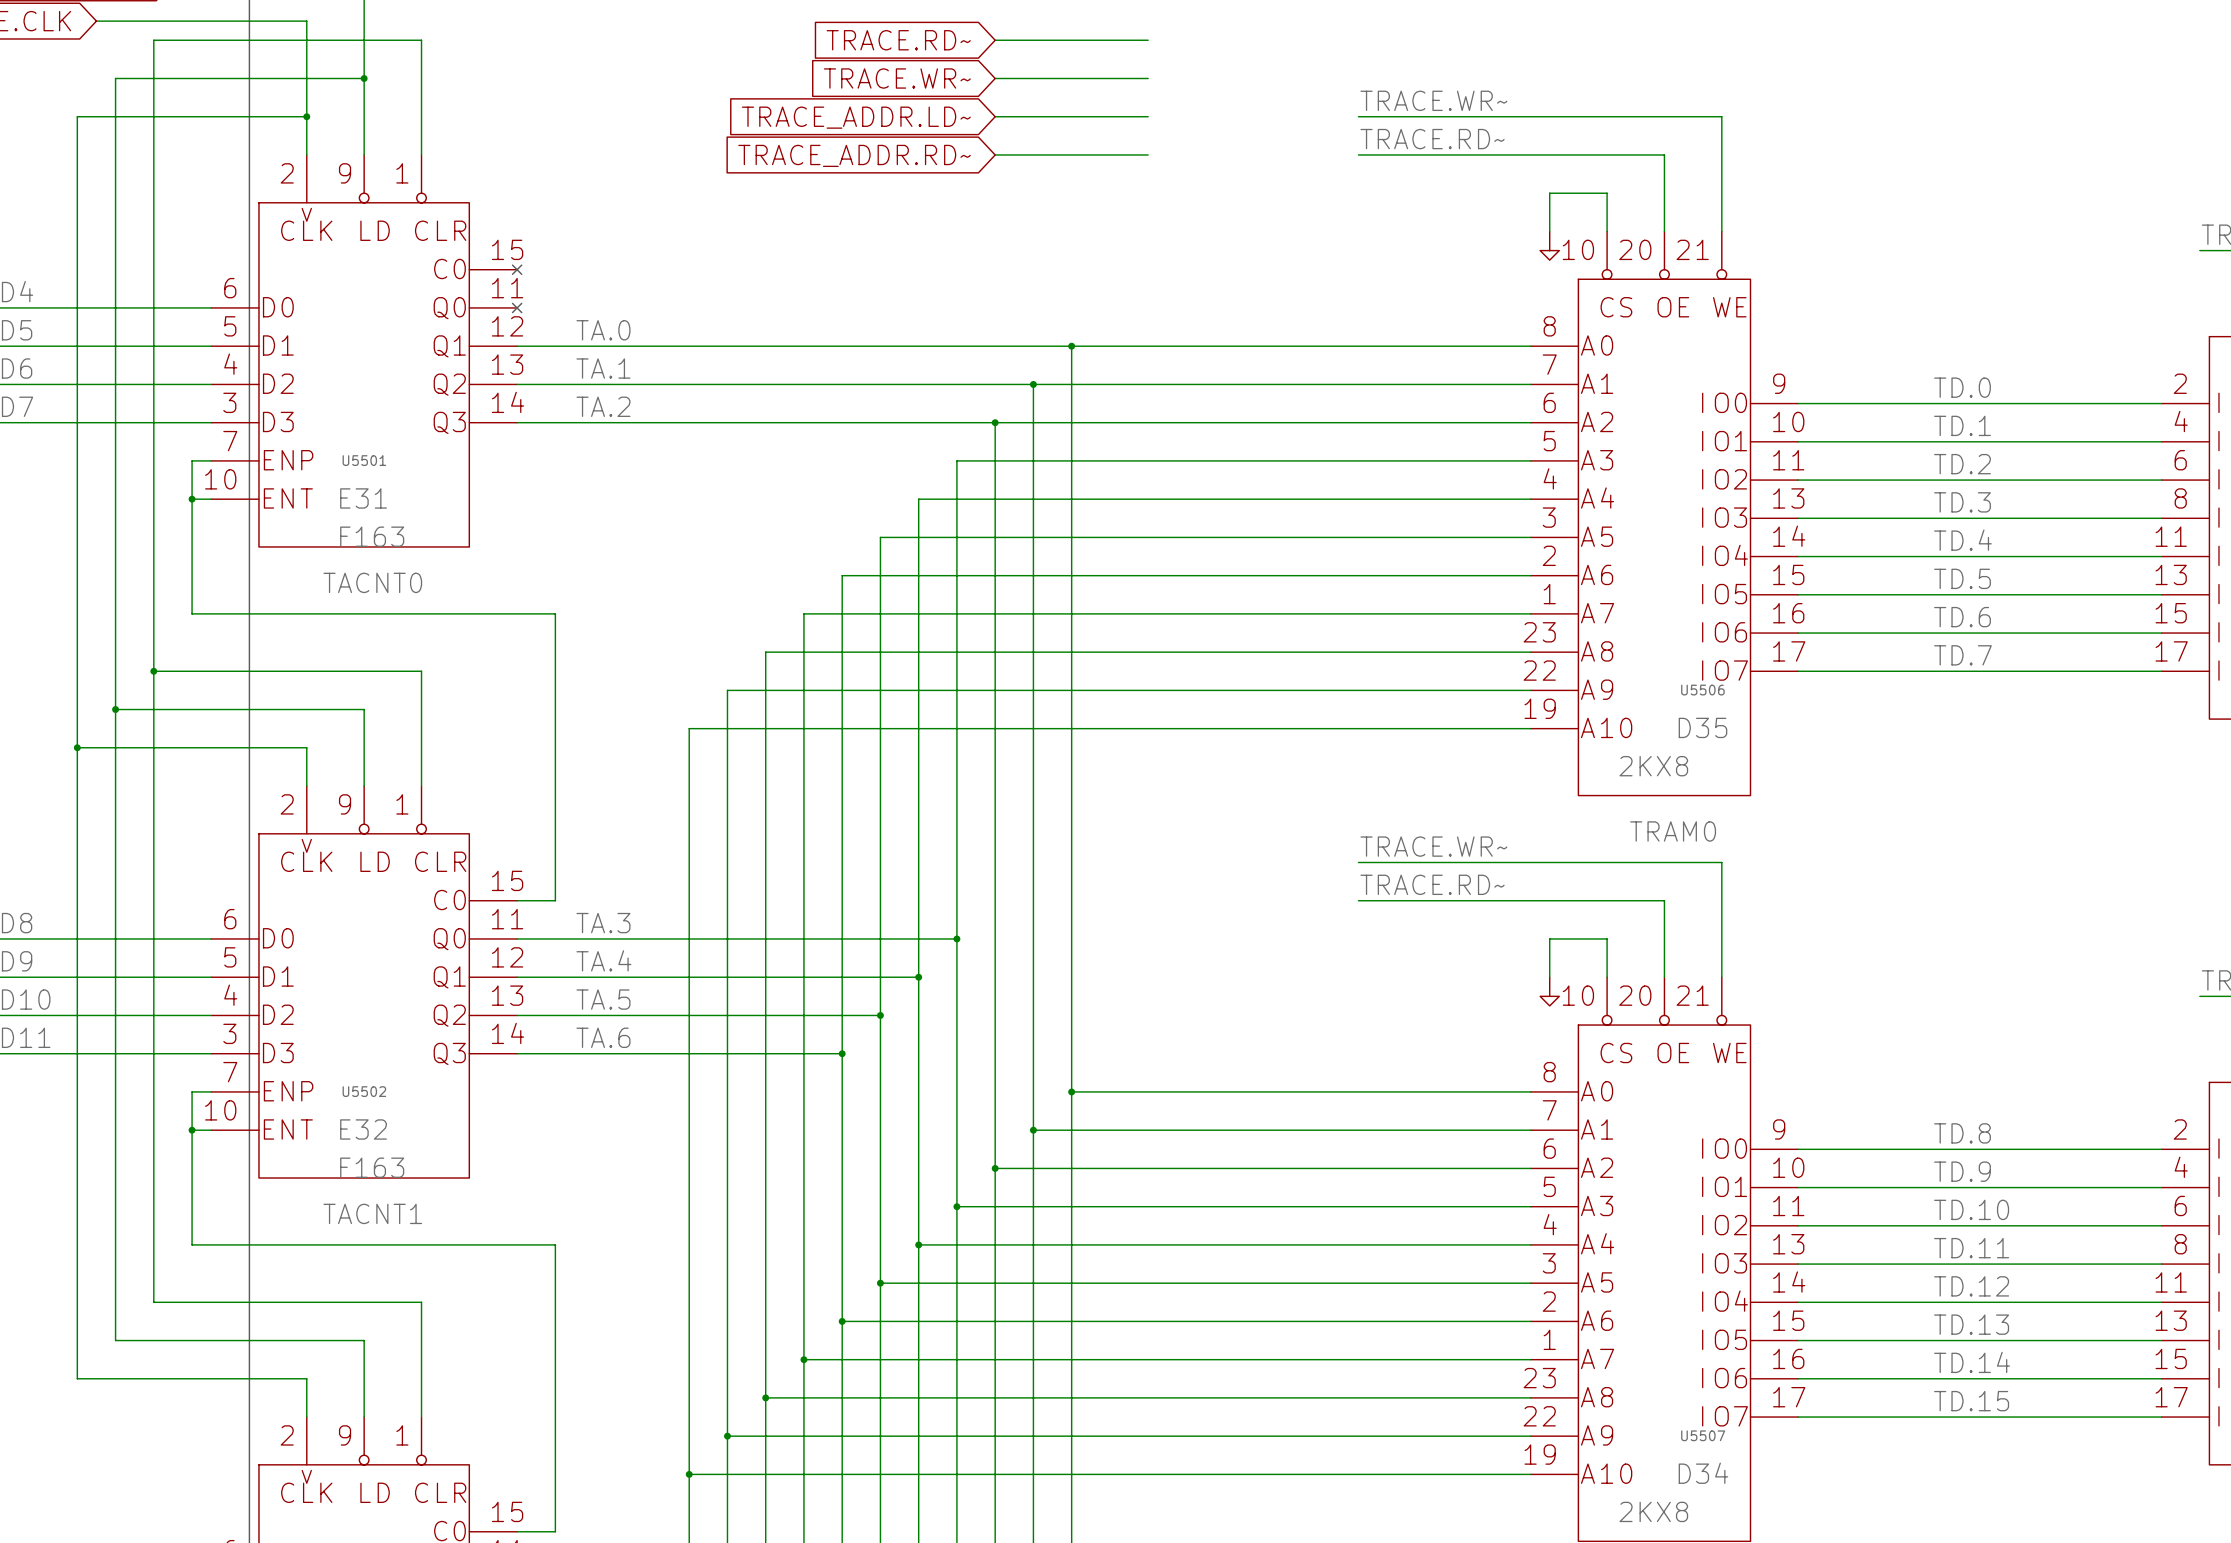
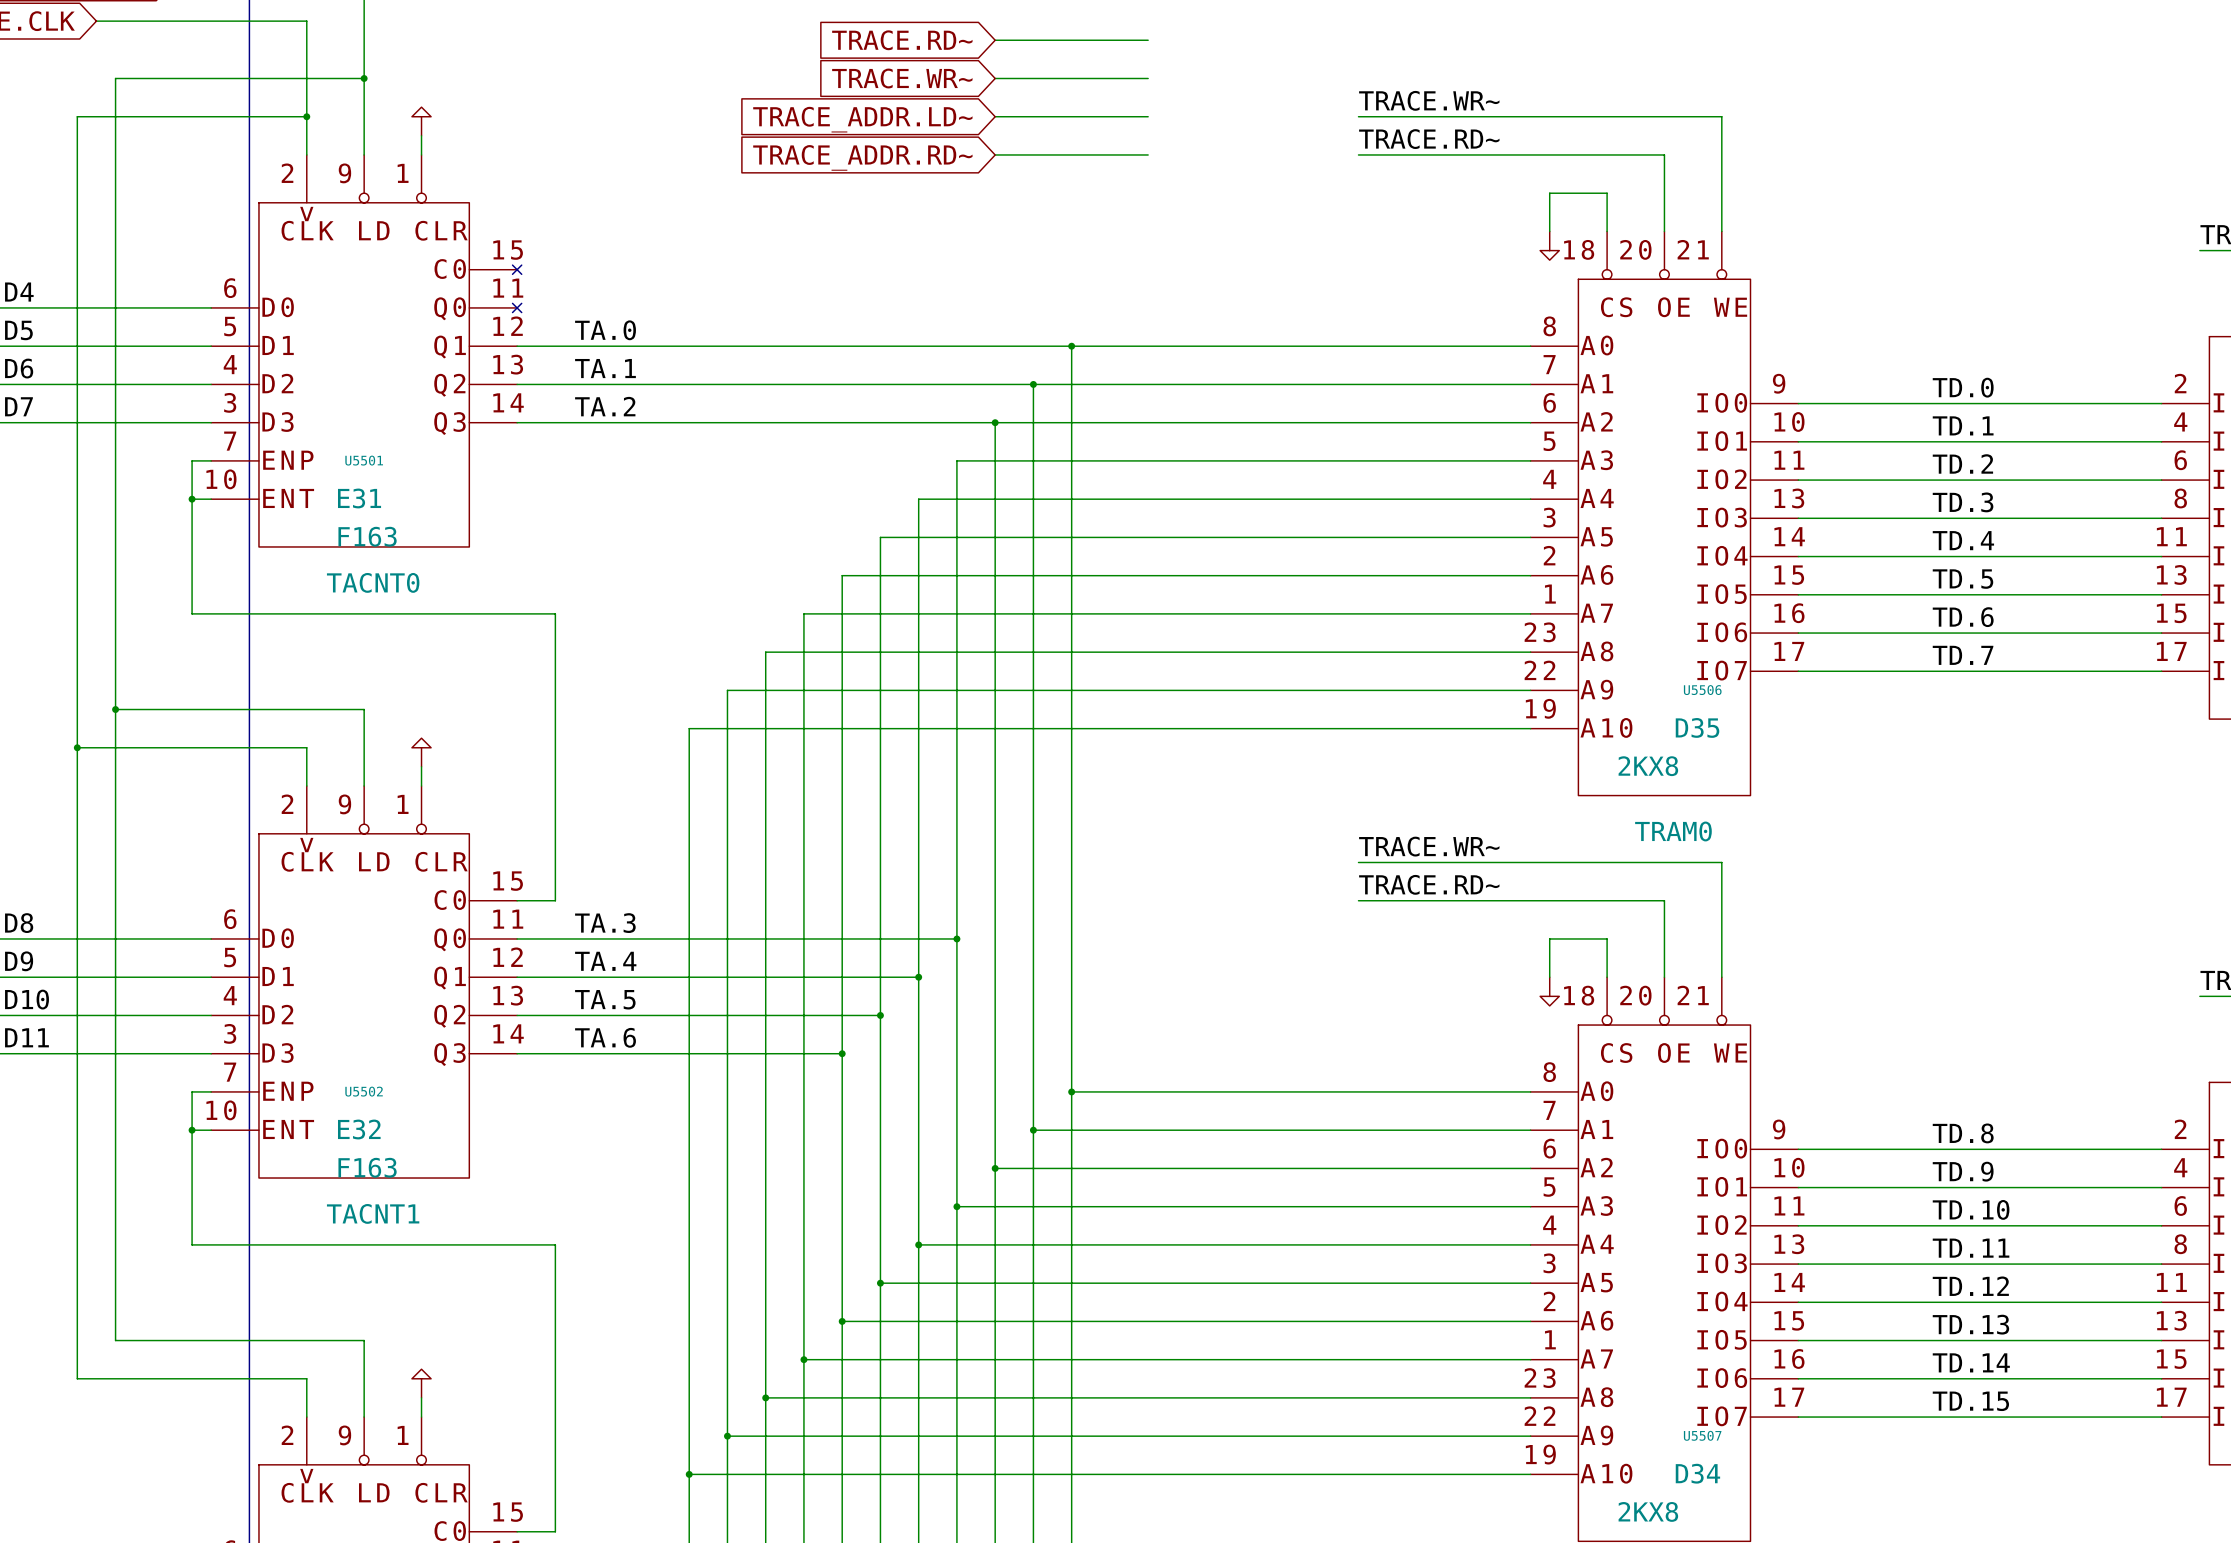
power symbol: none -> (421, 121)
wire: (421, 135) (421, 40) (153, 40) (153, 1302) (421, 1302) (421, 1397) -> none
U5506 text: 0 (1587, 249) -> 8 (1587, 249)
wire: (153, 671) (421, 671) (421, 766) -> none
junction: (153, 671) -> none
power symbol: none -> (421, 752)
U5507 text: 0 (1587, 995) -> 8 (1587, 995)
power symbol: none -> (421, 1383)

